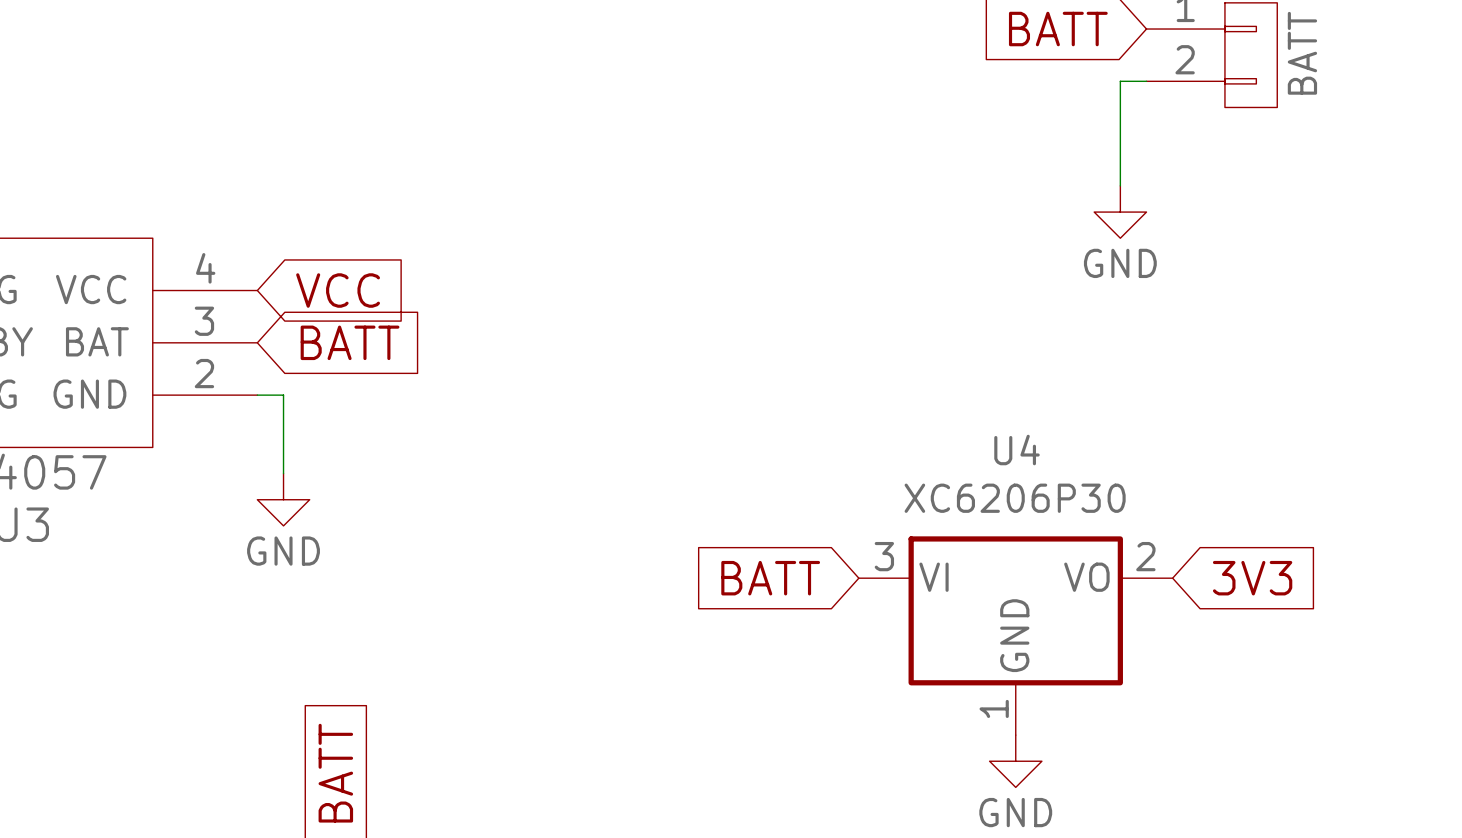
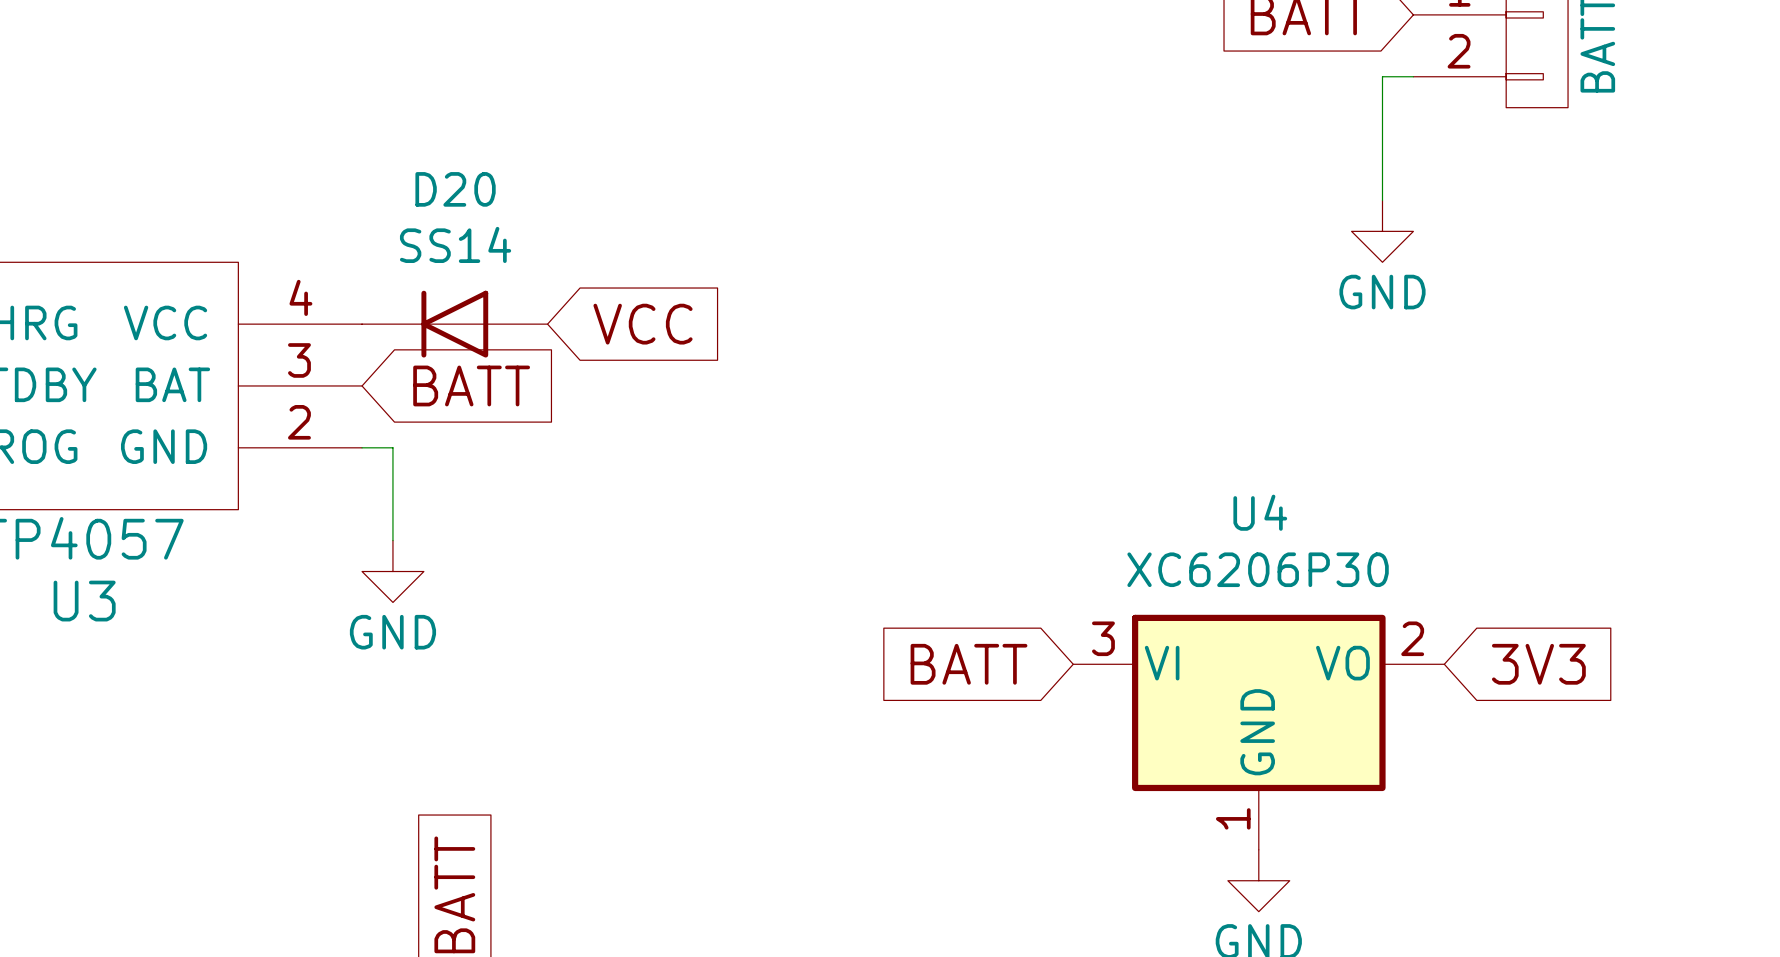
D20: none -> SS14 (454, 324)
global label position: VCC (338, 290) -> VCC (643, 324)

